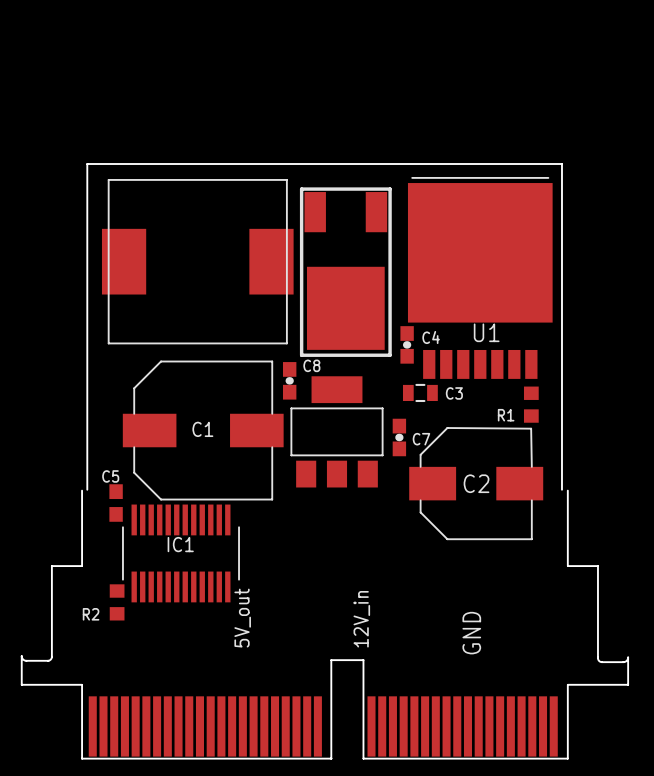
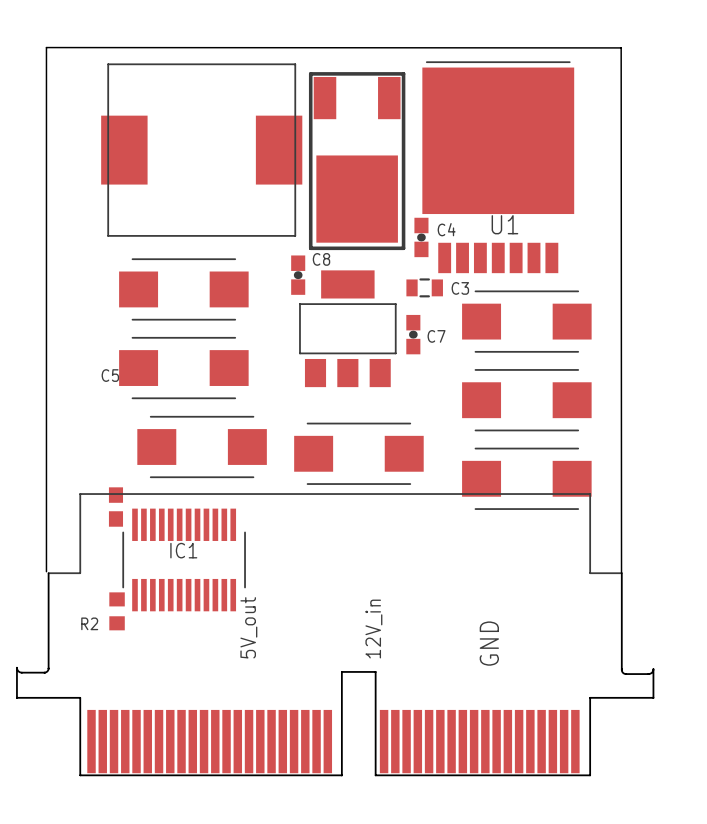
part position: (197, 261) -> (201, 150)
part position: (345, 272) -> (357, 161)
U1 position: (480, 277) -> (498, 167)
part: none -> (183, 289)
part: none -> (526, 321)
C4 position: (407, 344) -> (421, 237)
part: none -> (183, 368)
C8 position: (289, 380) -> (298, 275)
C3 position: (420, 392) -> (424, 287)
part: none -> (526, 400)
R1: (531, 404) -> none
C1: (203, 430) -> none
part position: (336, 431) -> (347, 328)
C7 position: (399, 437) -> (413, 334)
part: none -> (202, 447)
part: none -> (358, 453)
C5 name position: C5 (110, 476) -> C5 (110, 375)
part: none -> (526, 478)
C2: (476, 483) -> none
part footprint: [20, 489, 629, 760] -> [16, 493, 655, 777]
board edge: (87, 489) (87, 164) (561, 164) (561, 489) -> none
board edge: none -> (46, 571) (46, 47) (621, 47) (621, 572)

